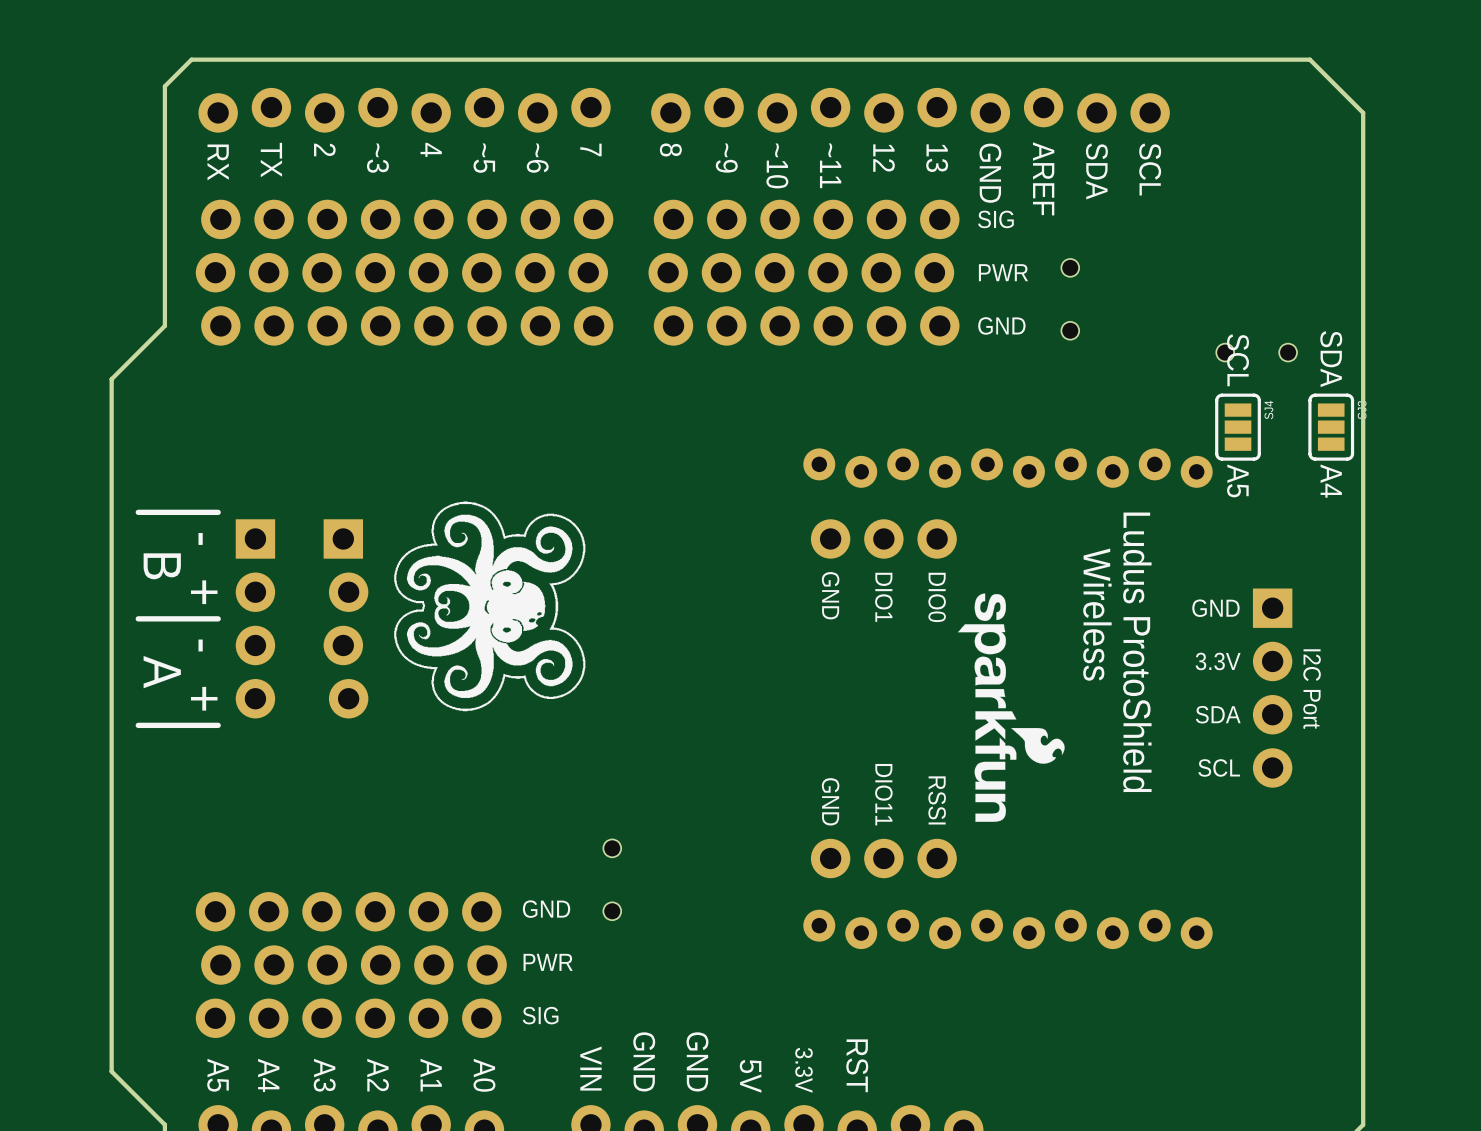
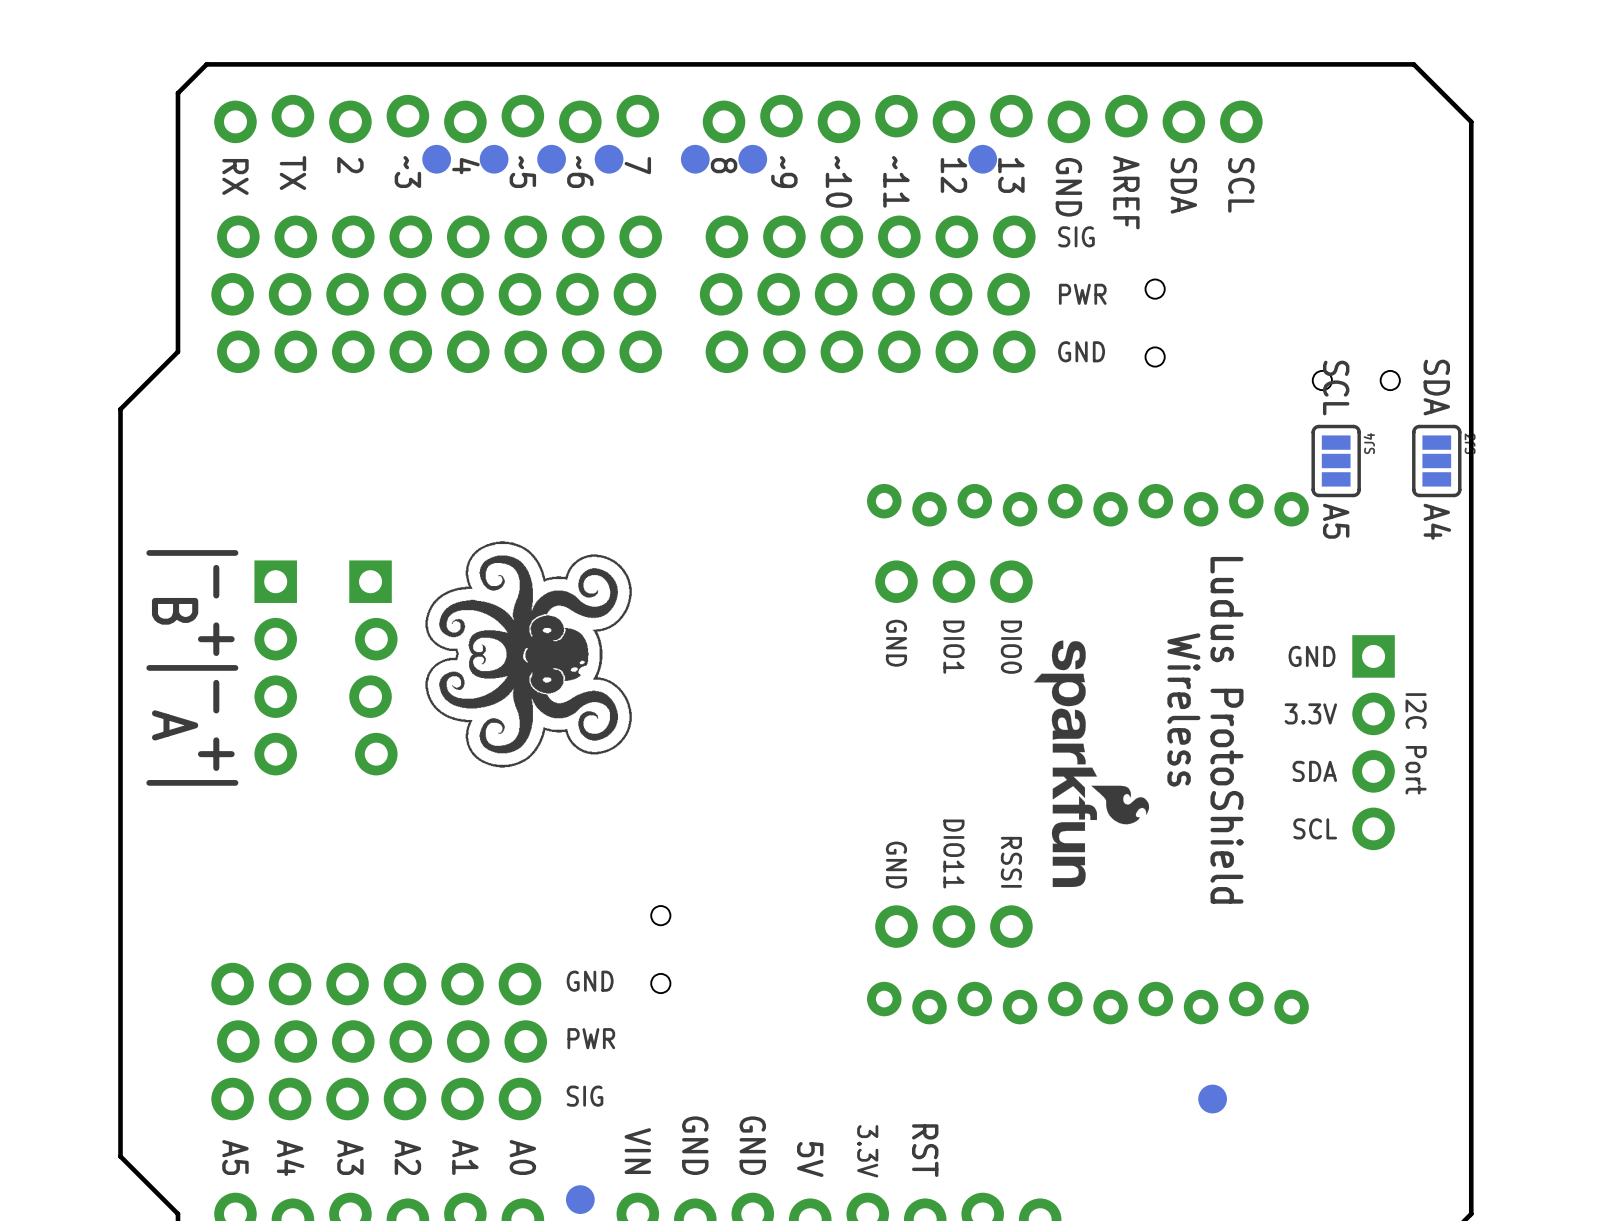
part: none -> (436, 159)
part: none -> (494, 159)
part: none -> (551, 159)
part: none -> (609, 159)
part: none -> (695, 159)
part: none -> (752, 159)
part: none -> (982, 159)
part: none -> (1212, 1099)
part: none -> (580, 1199)

